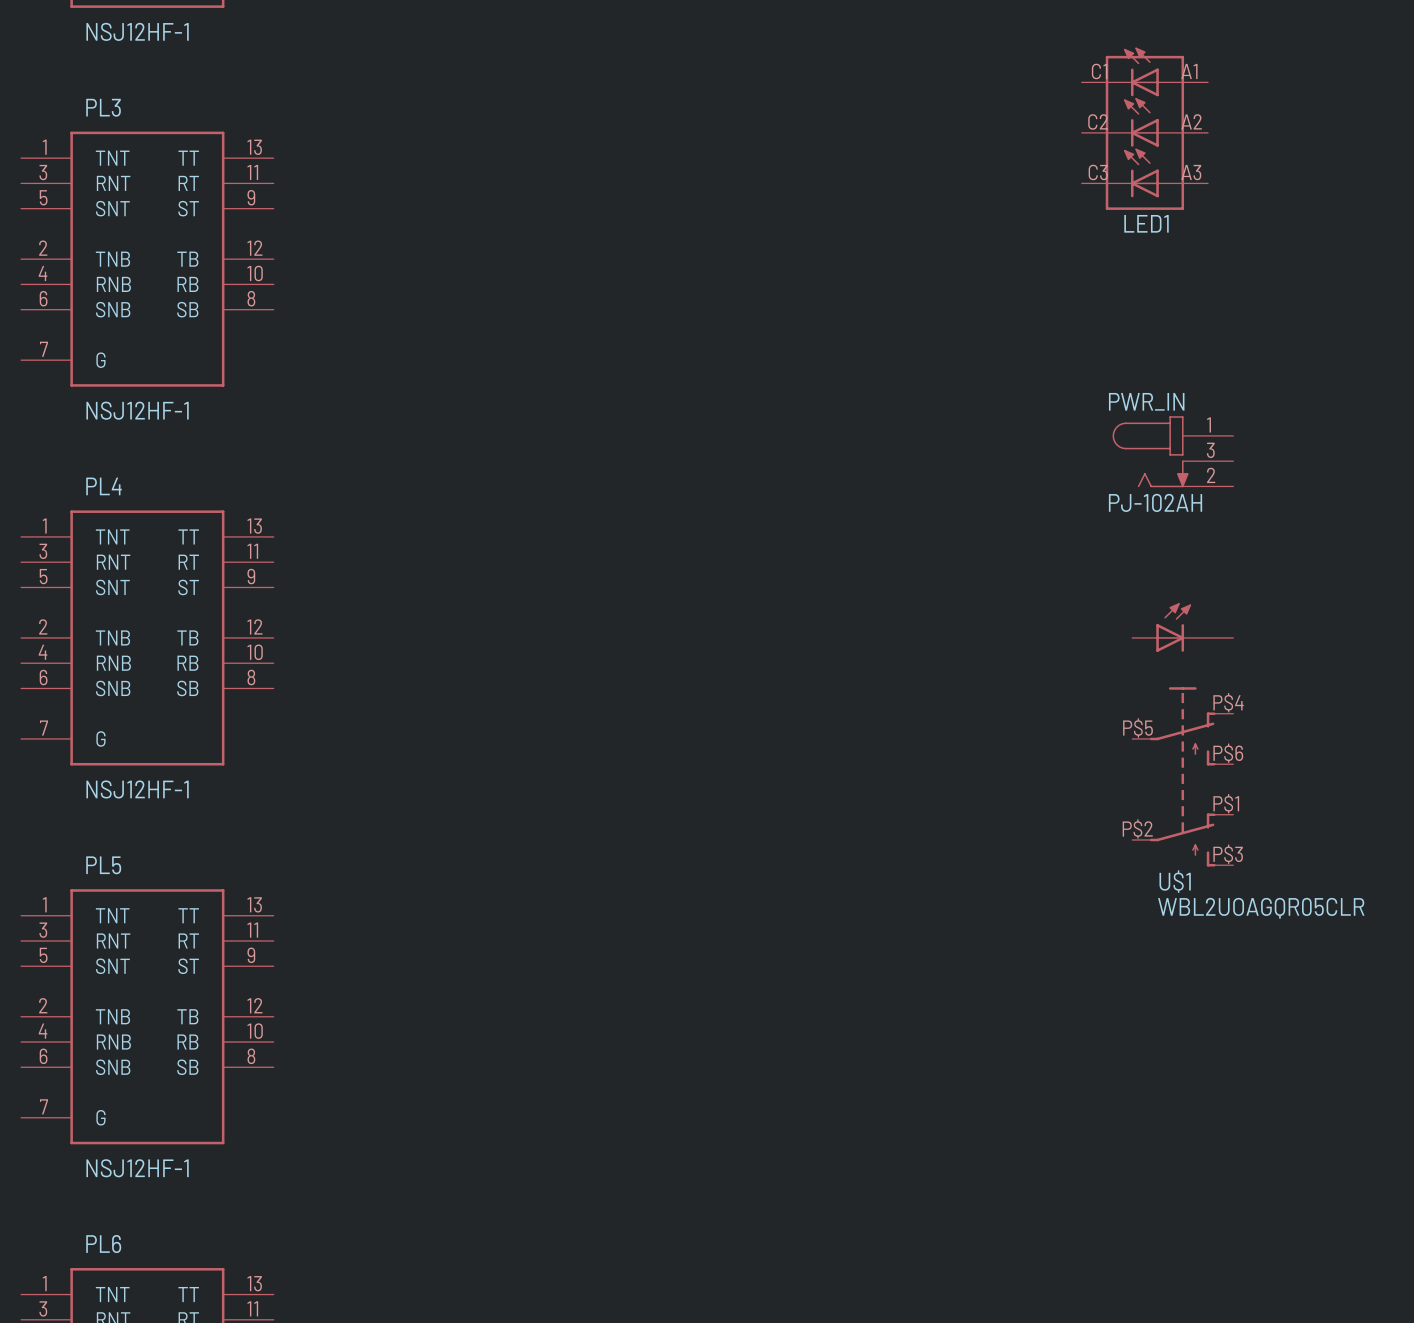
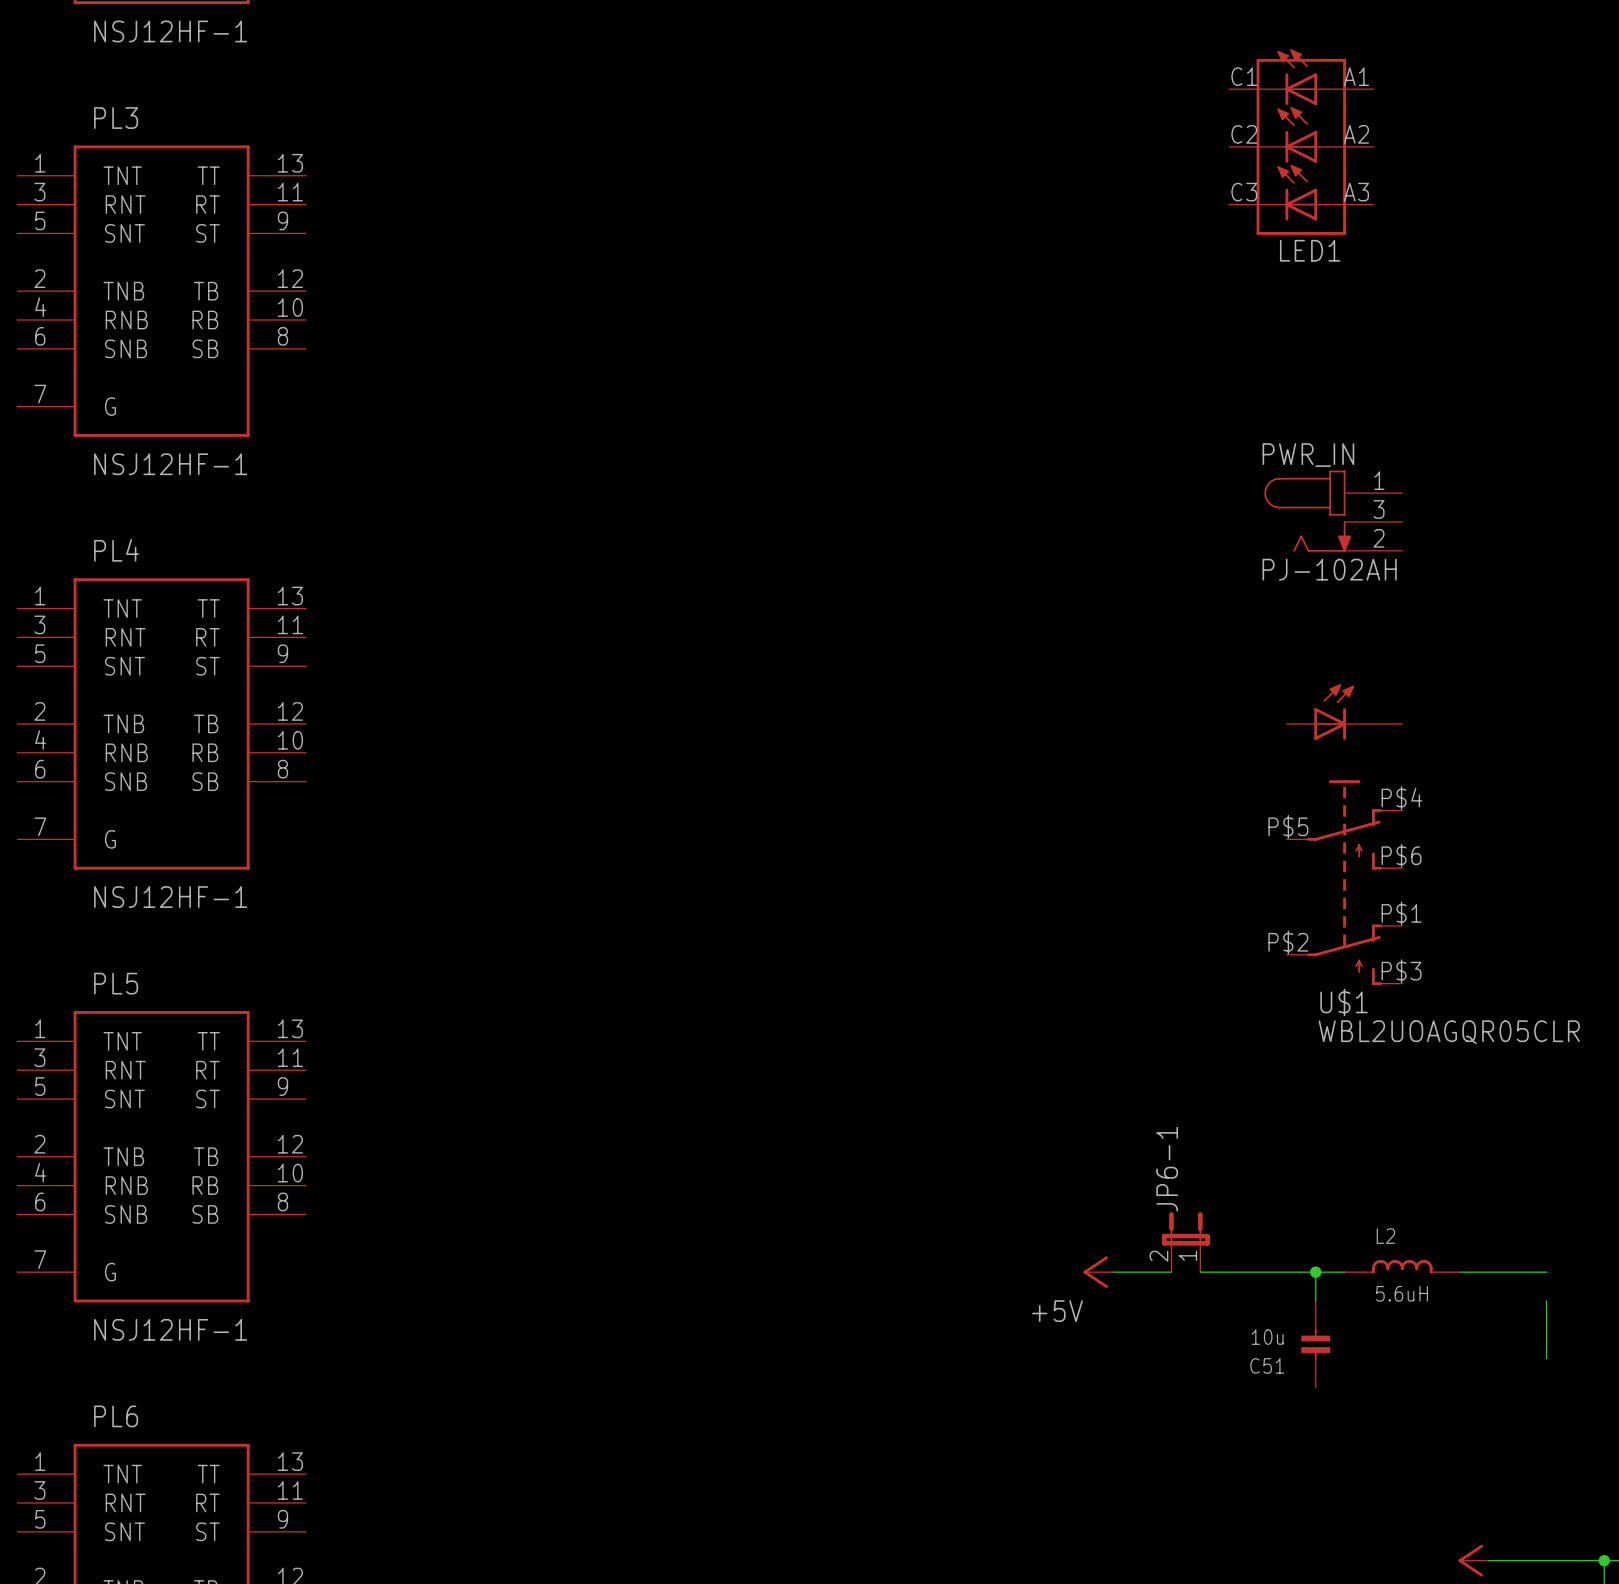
JP6-1: none -> (1185, 1242)
L2: none -> 5.6uH (1402, 1266)
power symbol: none -> +5V (1098, 1272)
wire: none -> (1113, 1272) (1171, 1272)
wire: none -> (1200, 1272) (1344, 1272)
wire: none -> (1315, 1272) (1315, 1301)
junction: none -> (1315, 1272)
wire: none -> (1460, 1272) (1546, 1272)
wire: none -> (1546, 1301) (1546, 1358)
C51: none -> 10u (1315, 1344)

